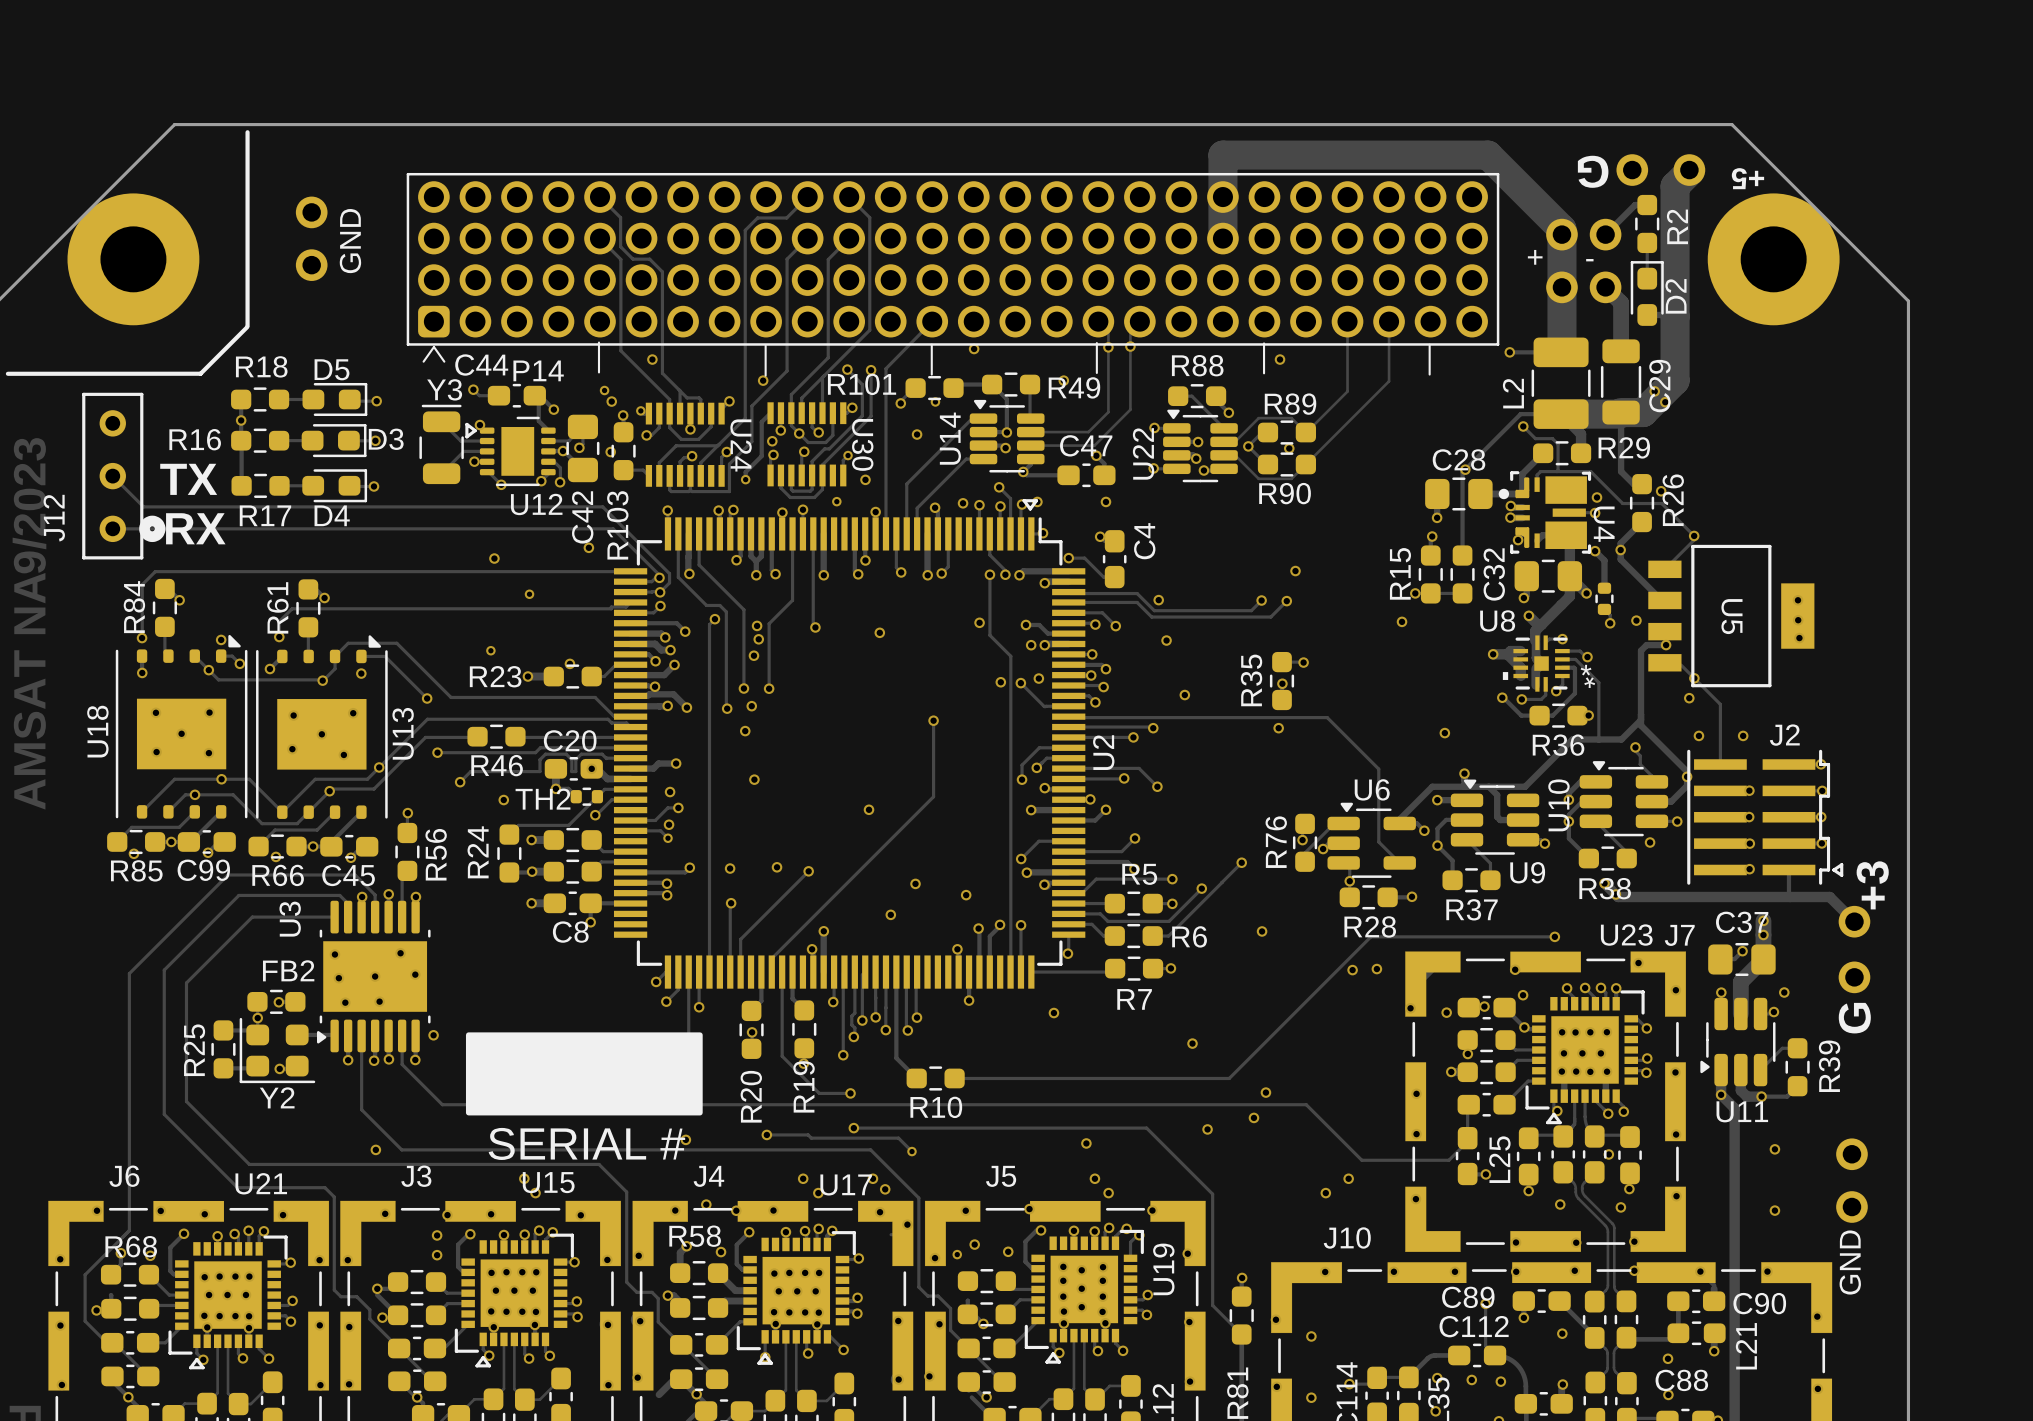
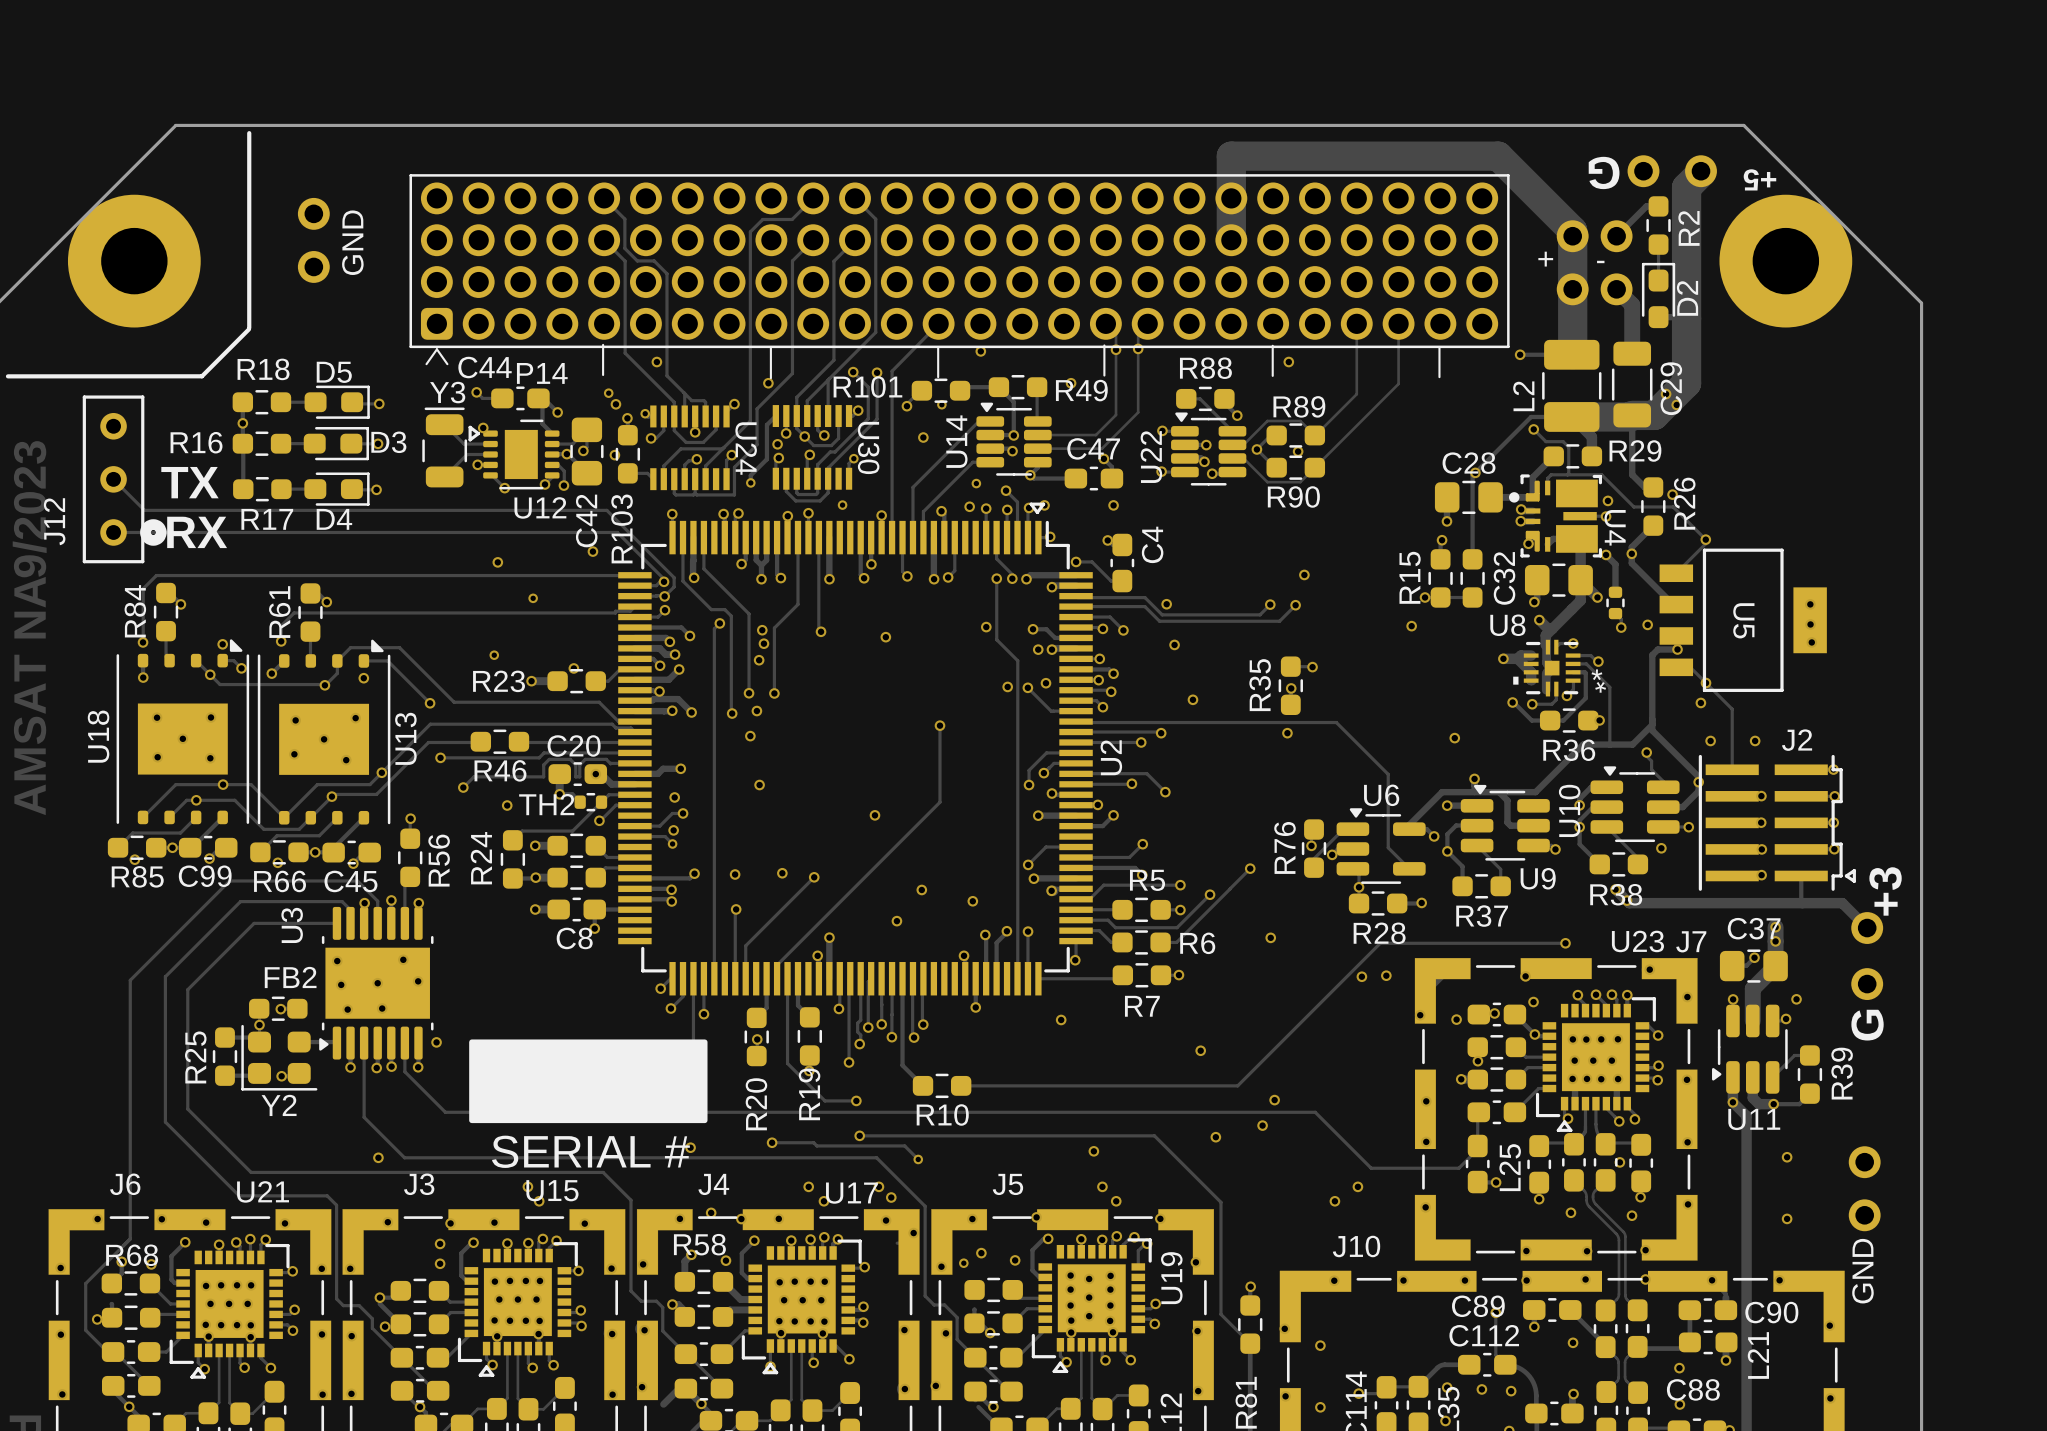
via: (865, 479) -> none
via: none -> (976, 483)

